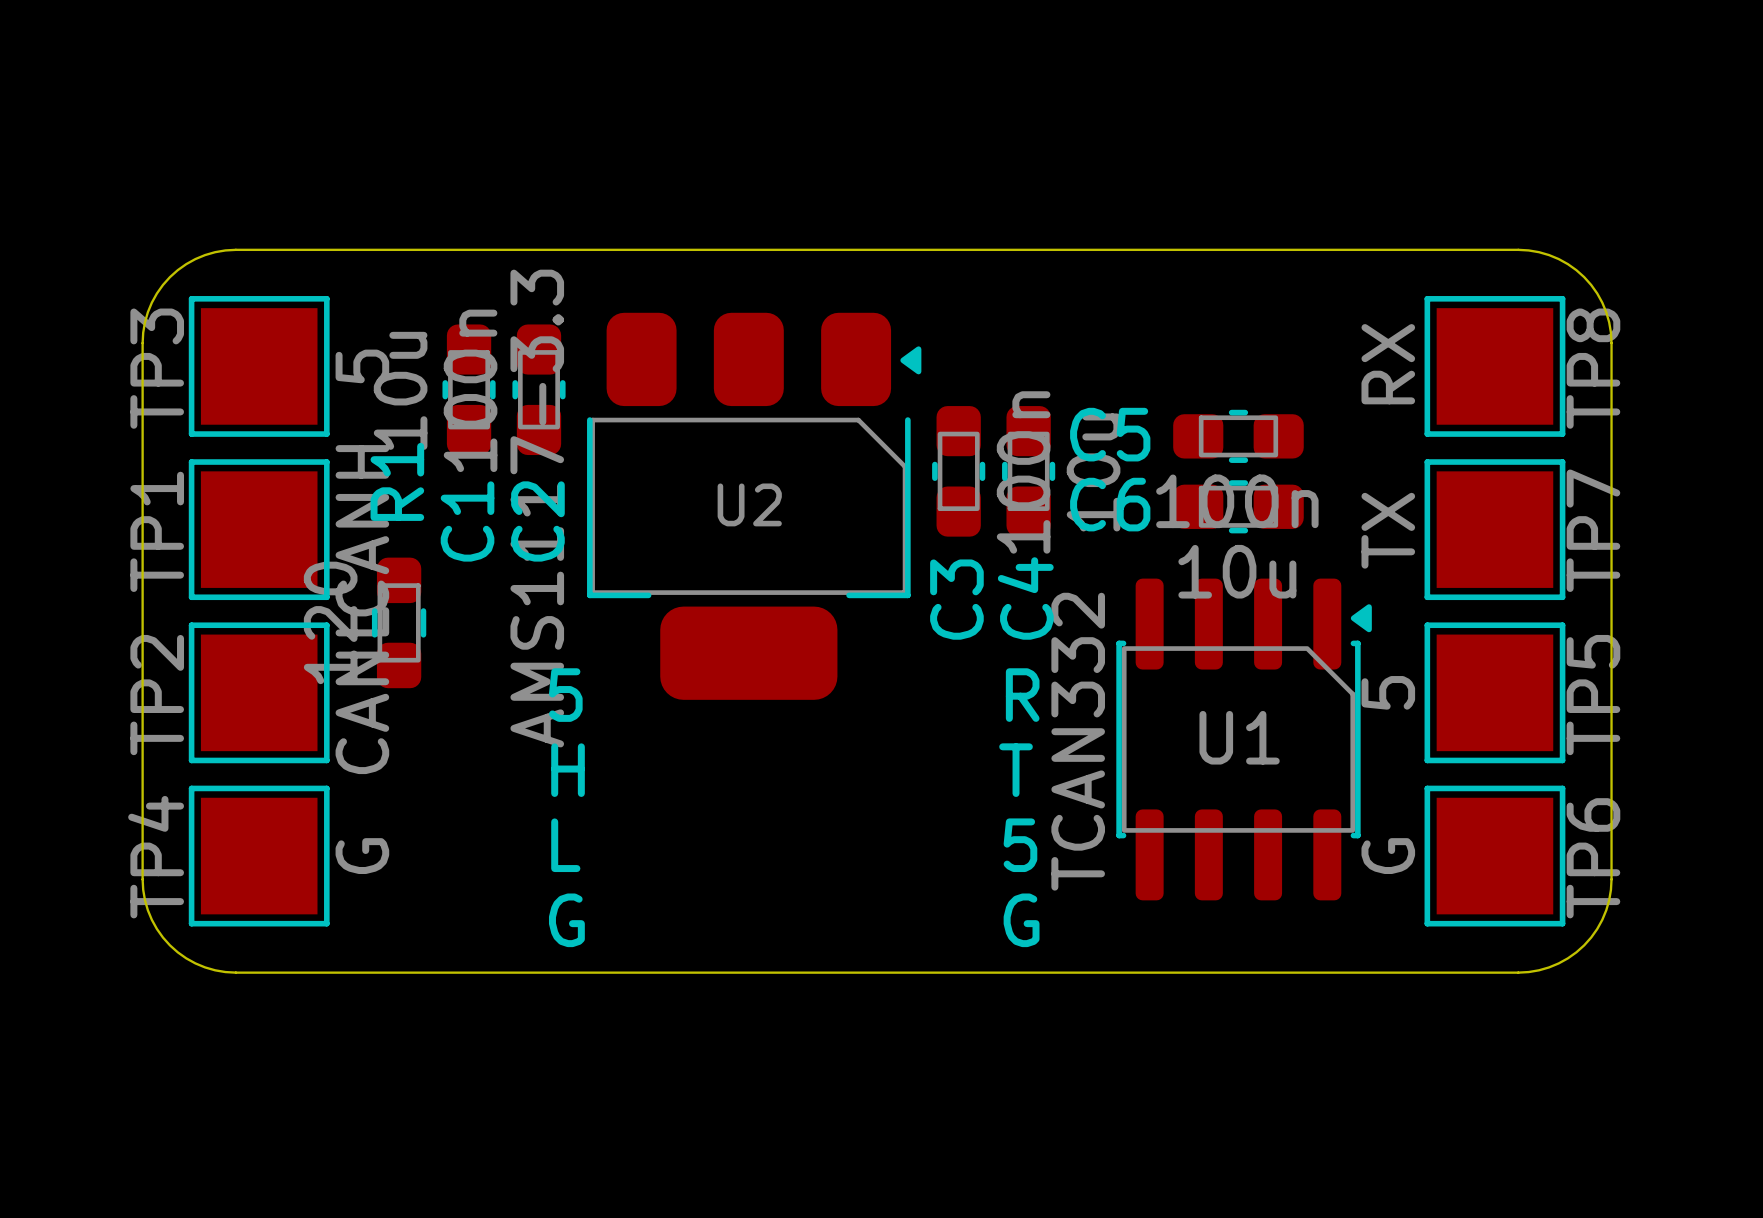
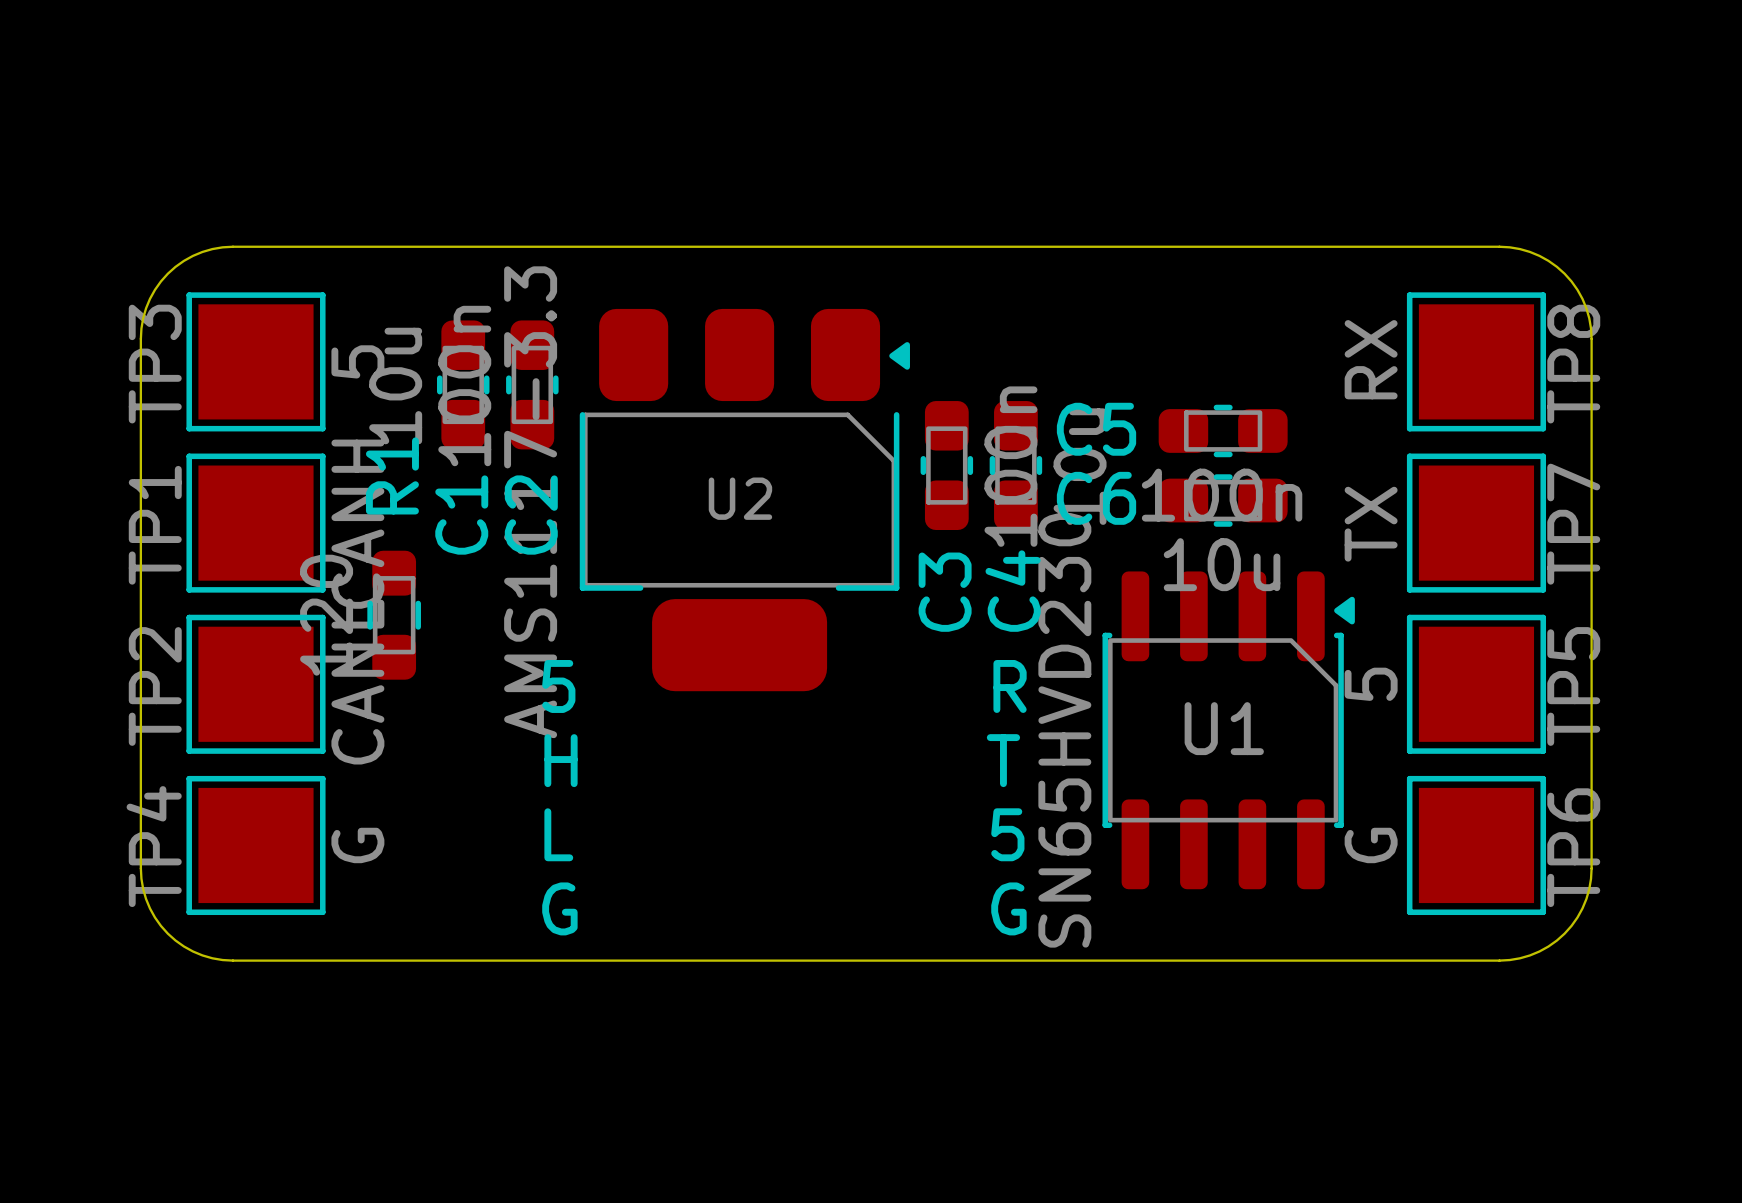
U1 value: TCAN332 (1078, 741) -> SN65HVD230 (1064, 730)

